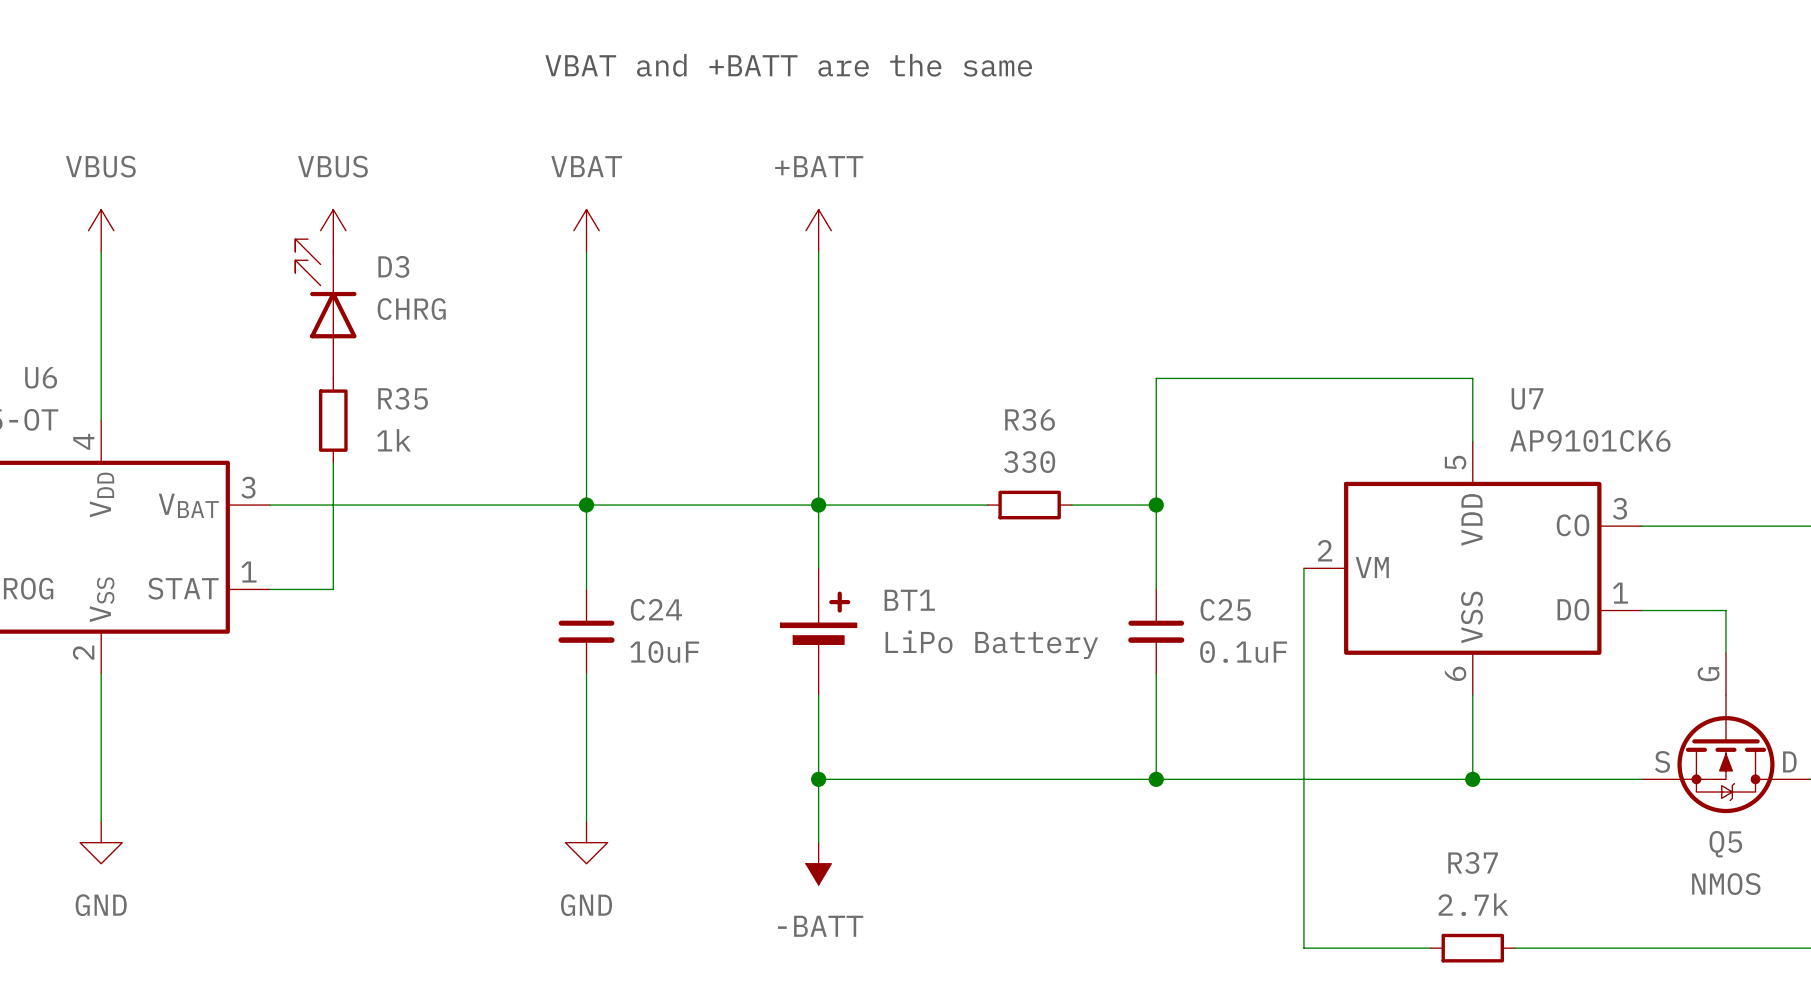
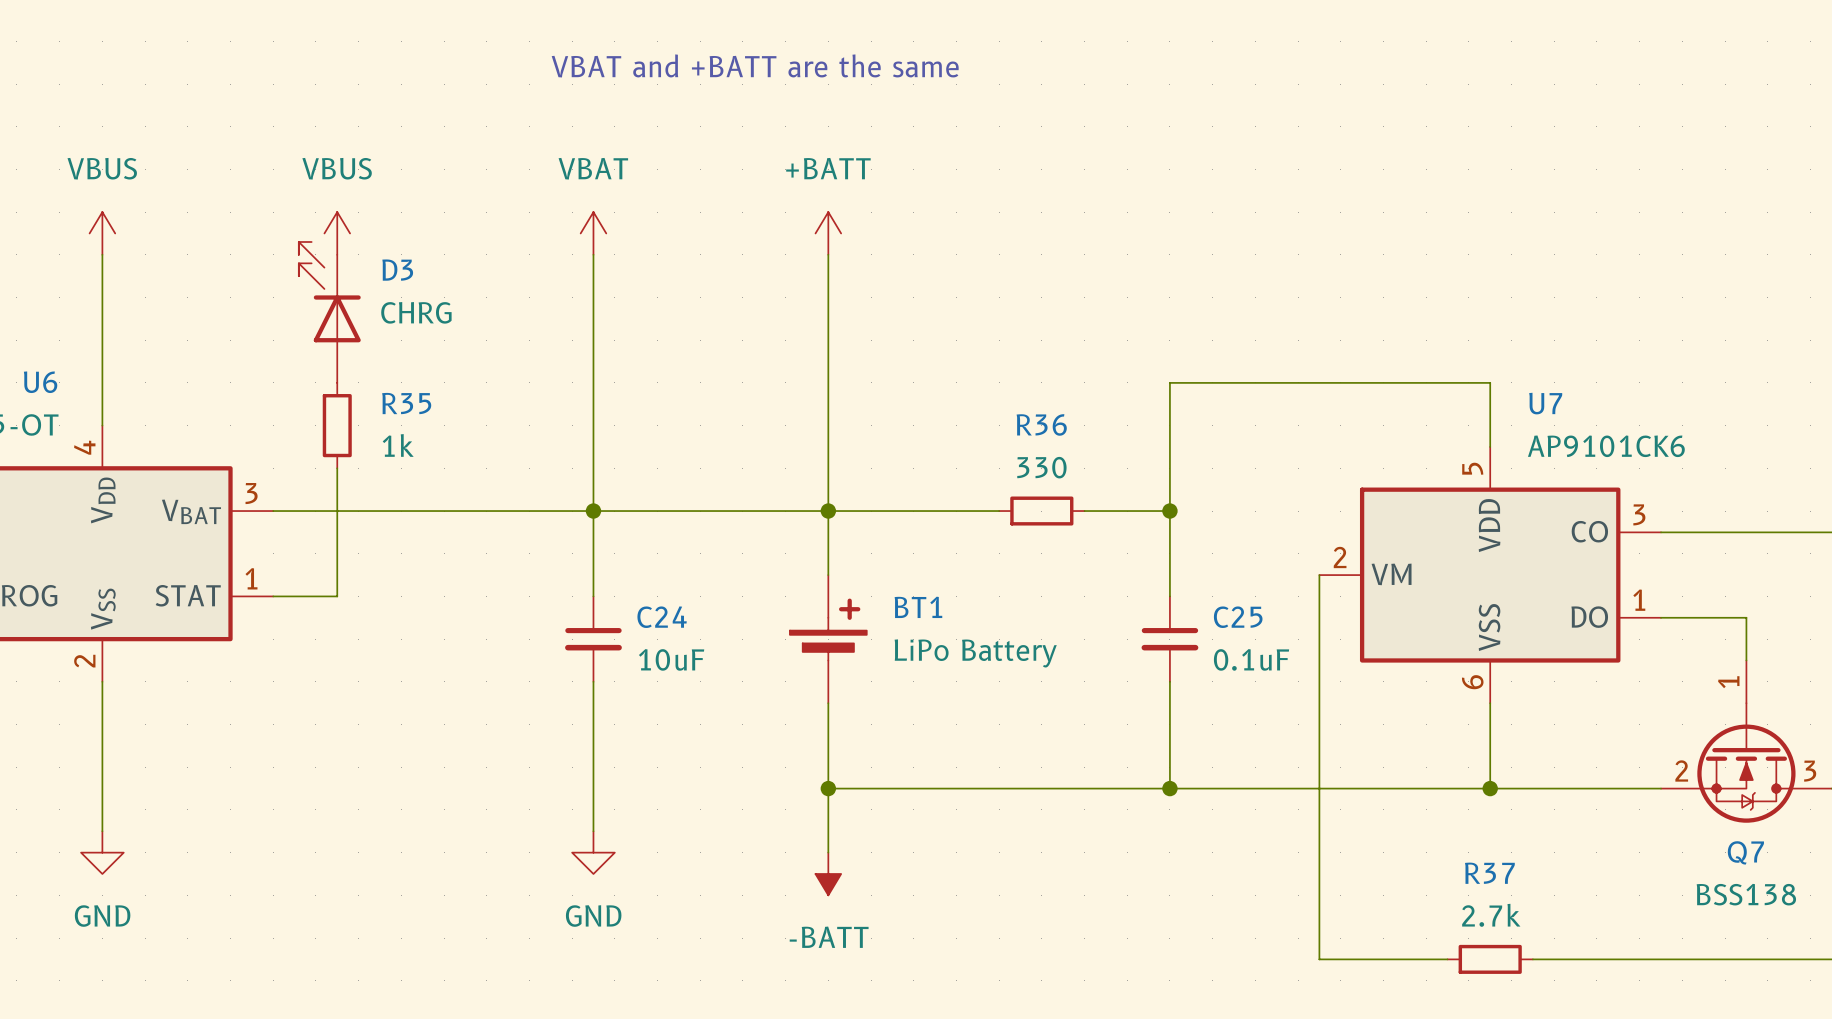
Q5 pin number: none -> 1 (1728, 682)
Q5 pin name: G (1708, 674) -> none
Q5 pin name: S (1662, 761) -> none
Q5 pin number: none -> 2 (1681, 770)
Q5 pin number: none -> 3 (1810, 771)
Q5 pin name: D (1789, 761) -> none
Q5 name: Q5 (1725, 844) -> Q7 (1745, 852)
Q5 value: NMOS (1726, 884) -> BSS138 (1746, 894)

